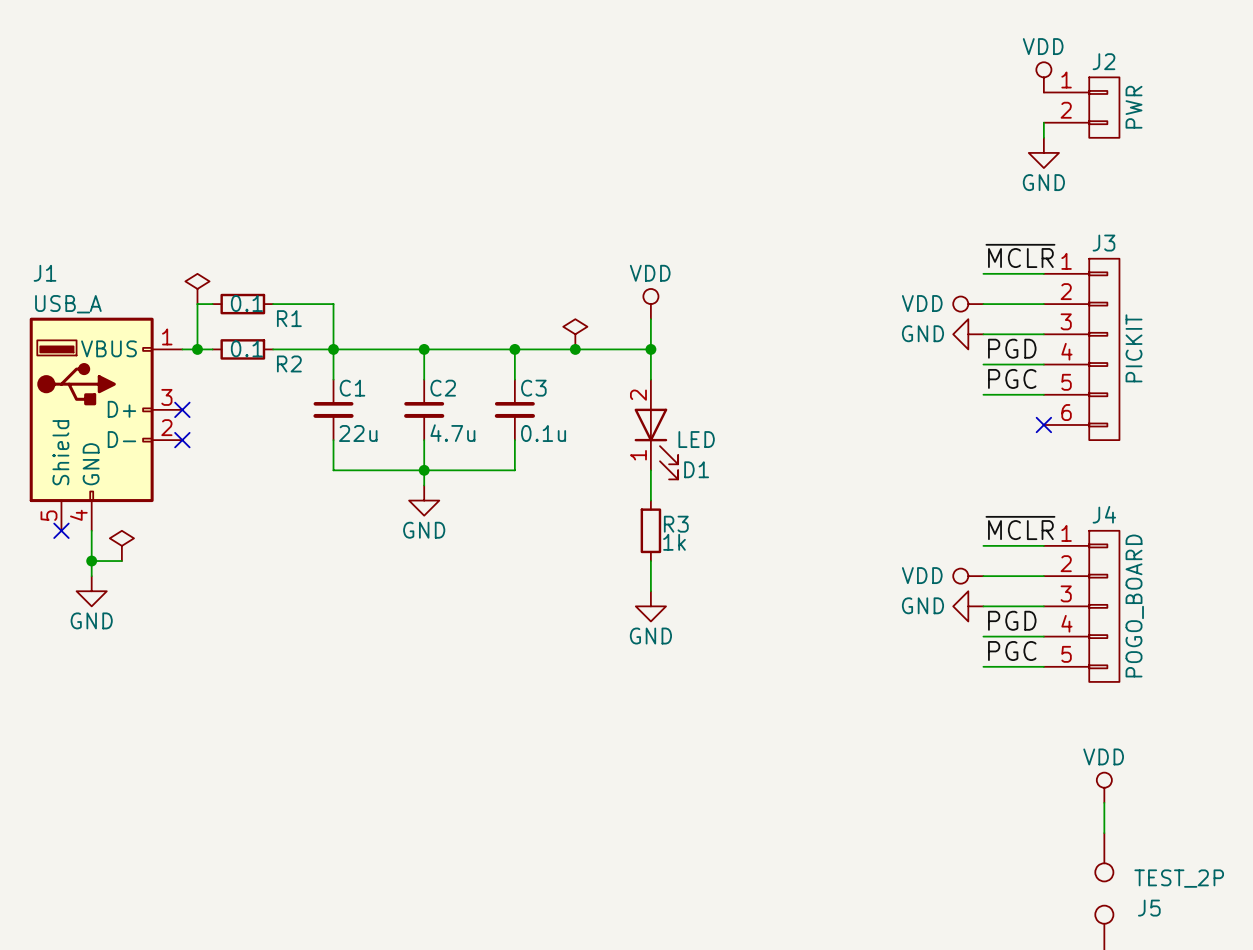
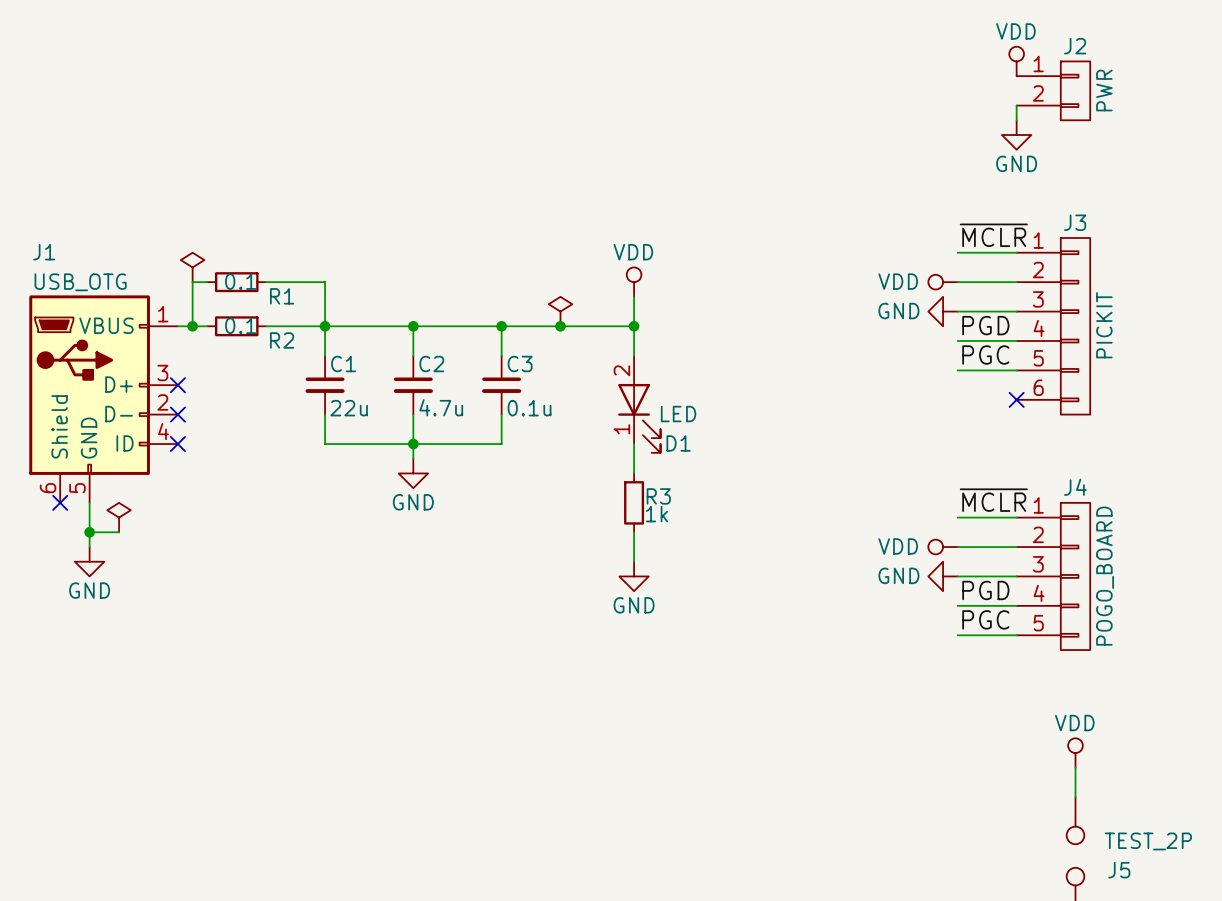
J1 value: USB_A (68, 304) -> USB_OTG (80, 282)
J1 symbol: [29, 317, 183, 531] -> [29, 295, 178, 503]
no-connect mark: none -> (177, 444)

